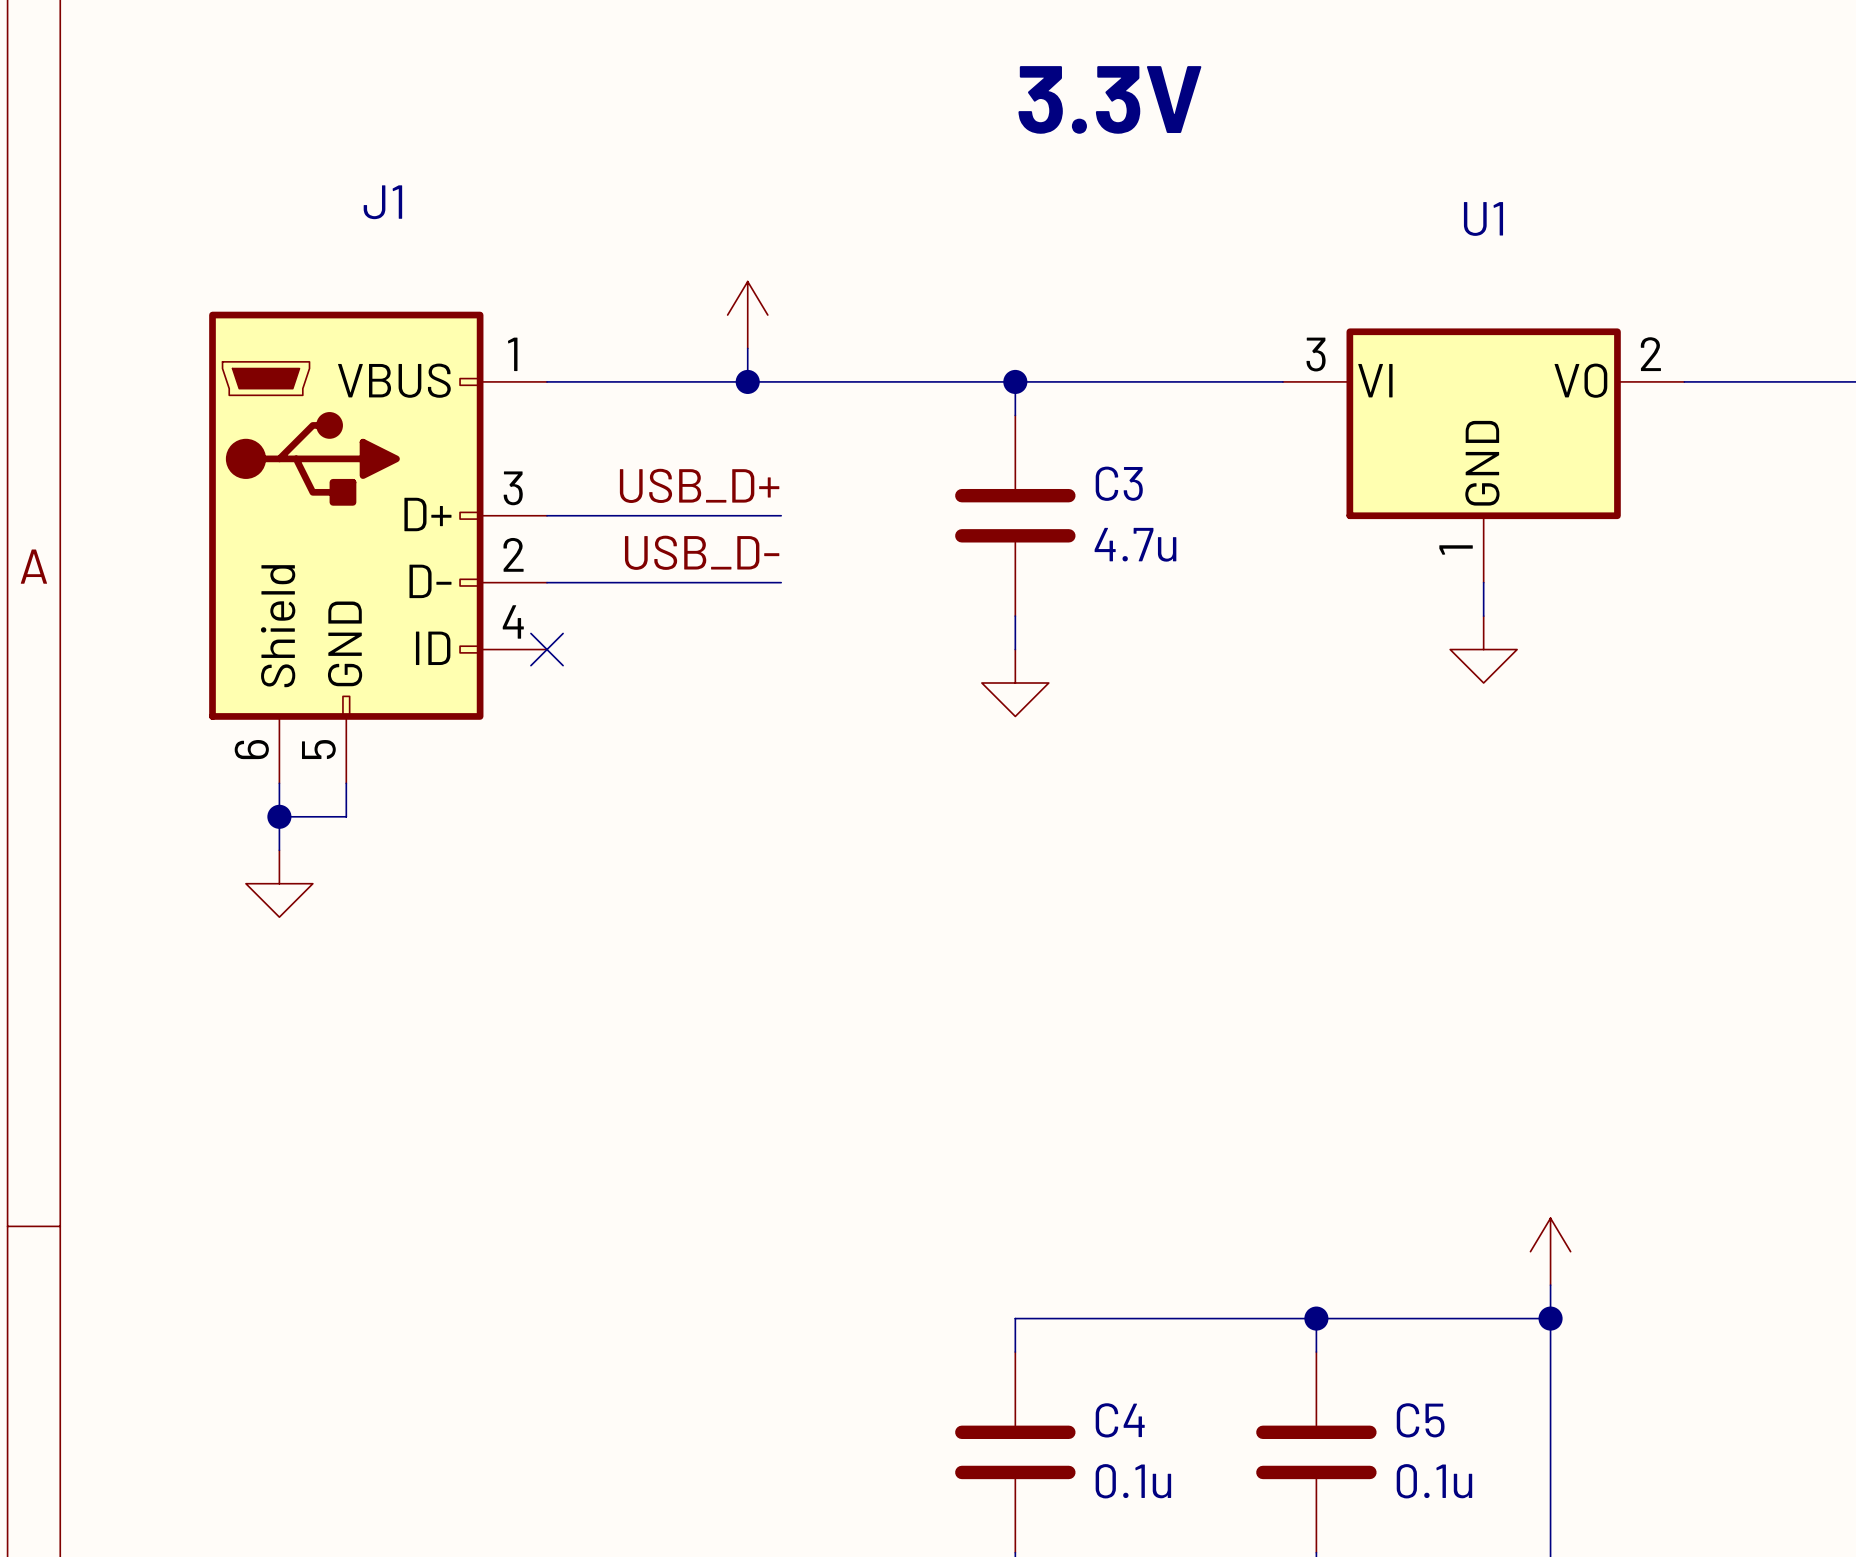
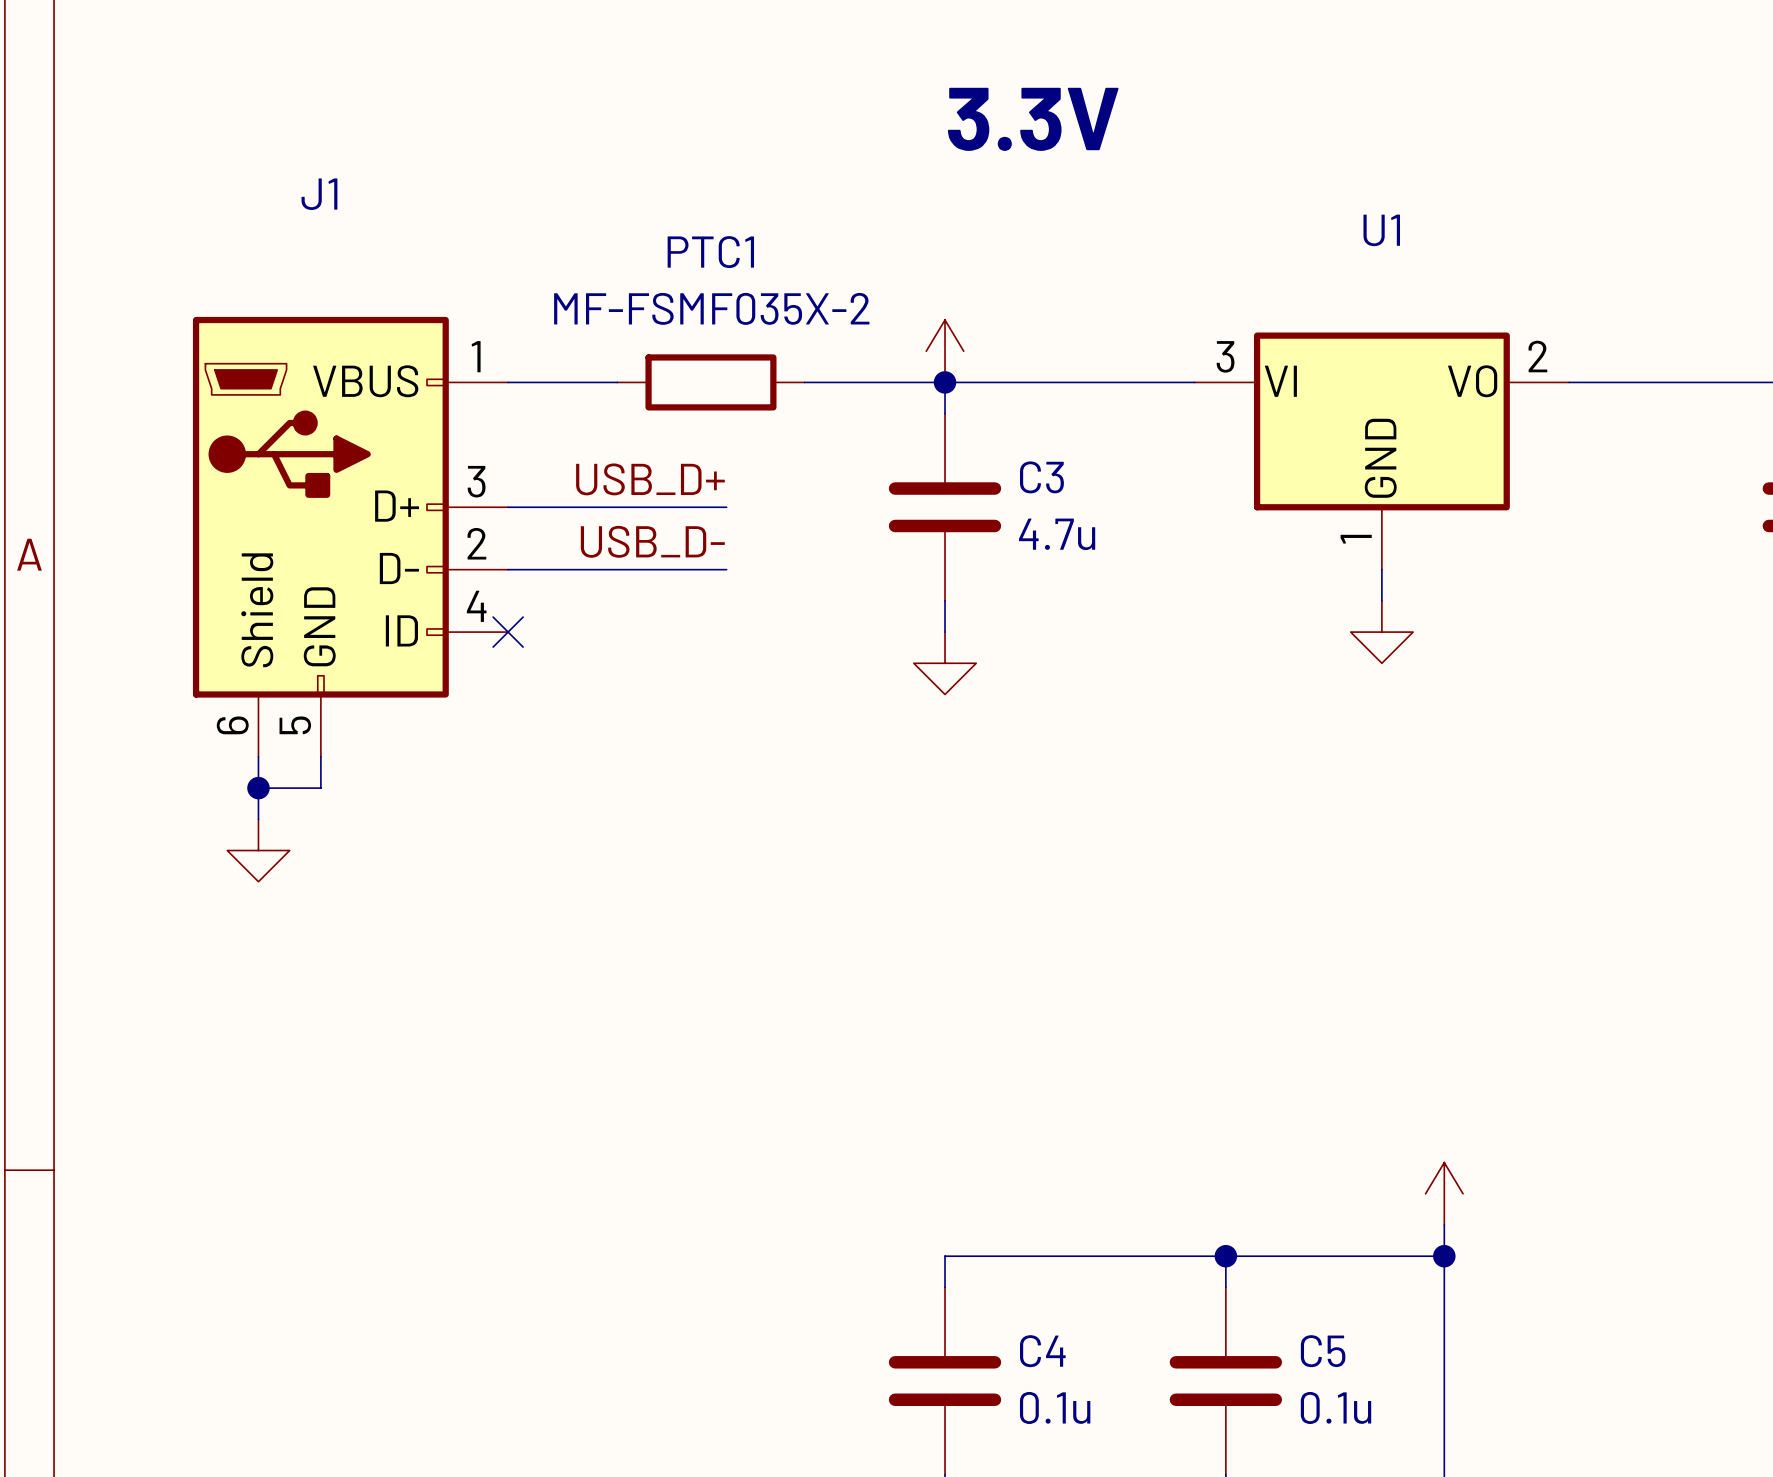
J1 name position: J1 (382, 202) -> J1 (319, 194)
power symbol position: (747, 315) -> (945, 351)
wire: (747, 348) (747, 381) -> none
wire: (664, 381) (864, 381) -> none
junction: (747, 381) -> none
PTC1: none -> MF-FSMF035X-2 (710, 382)

